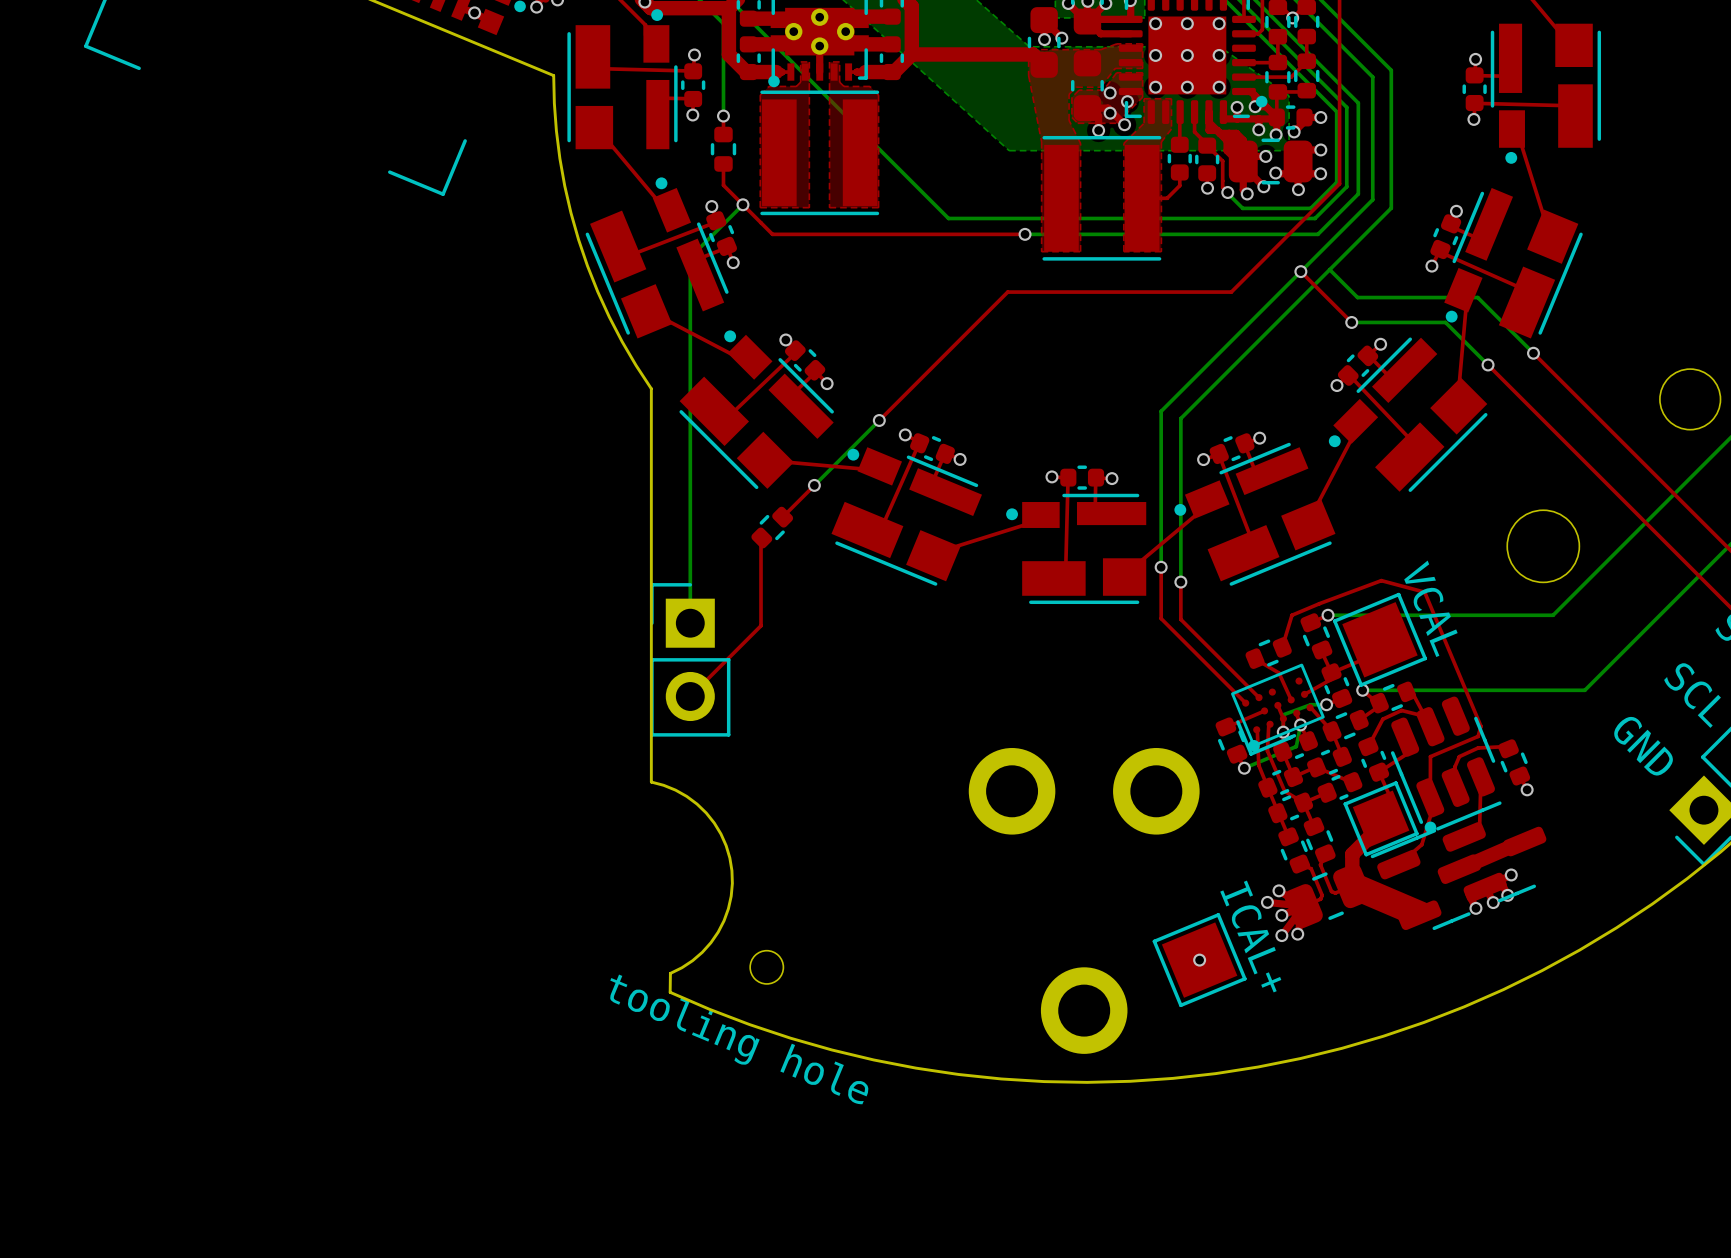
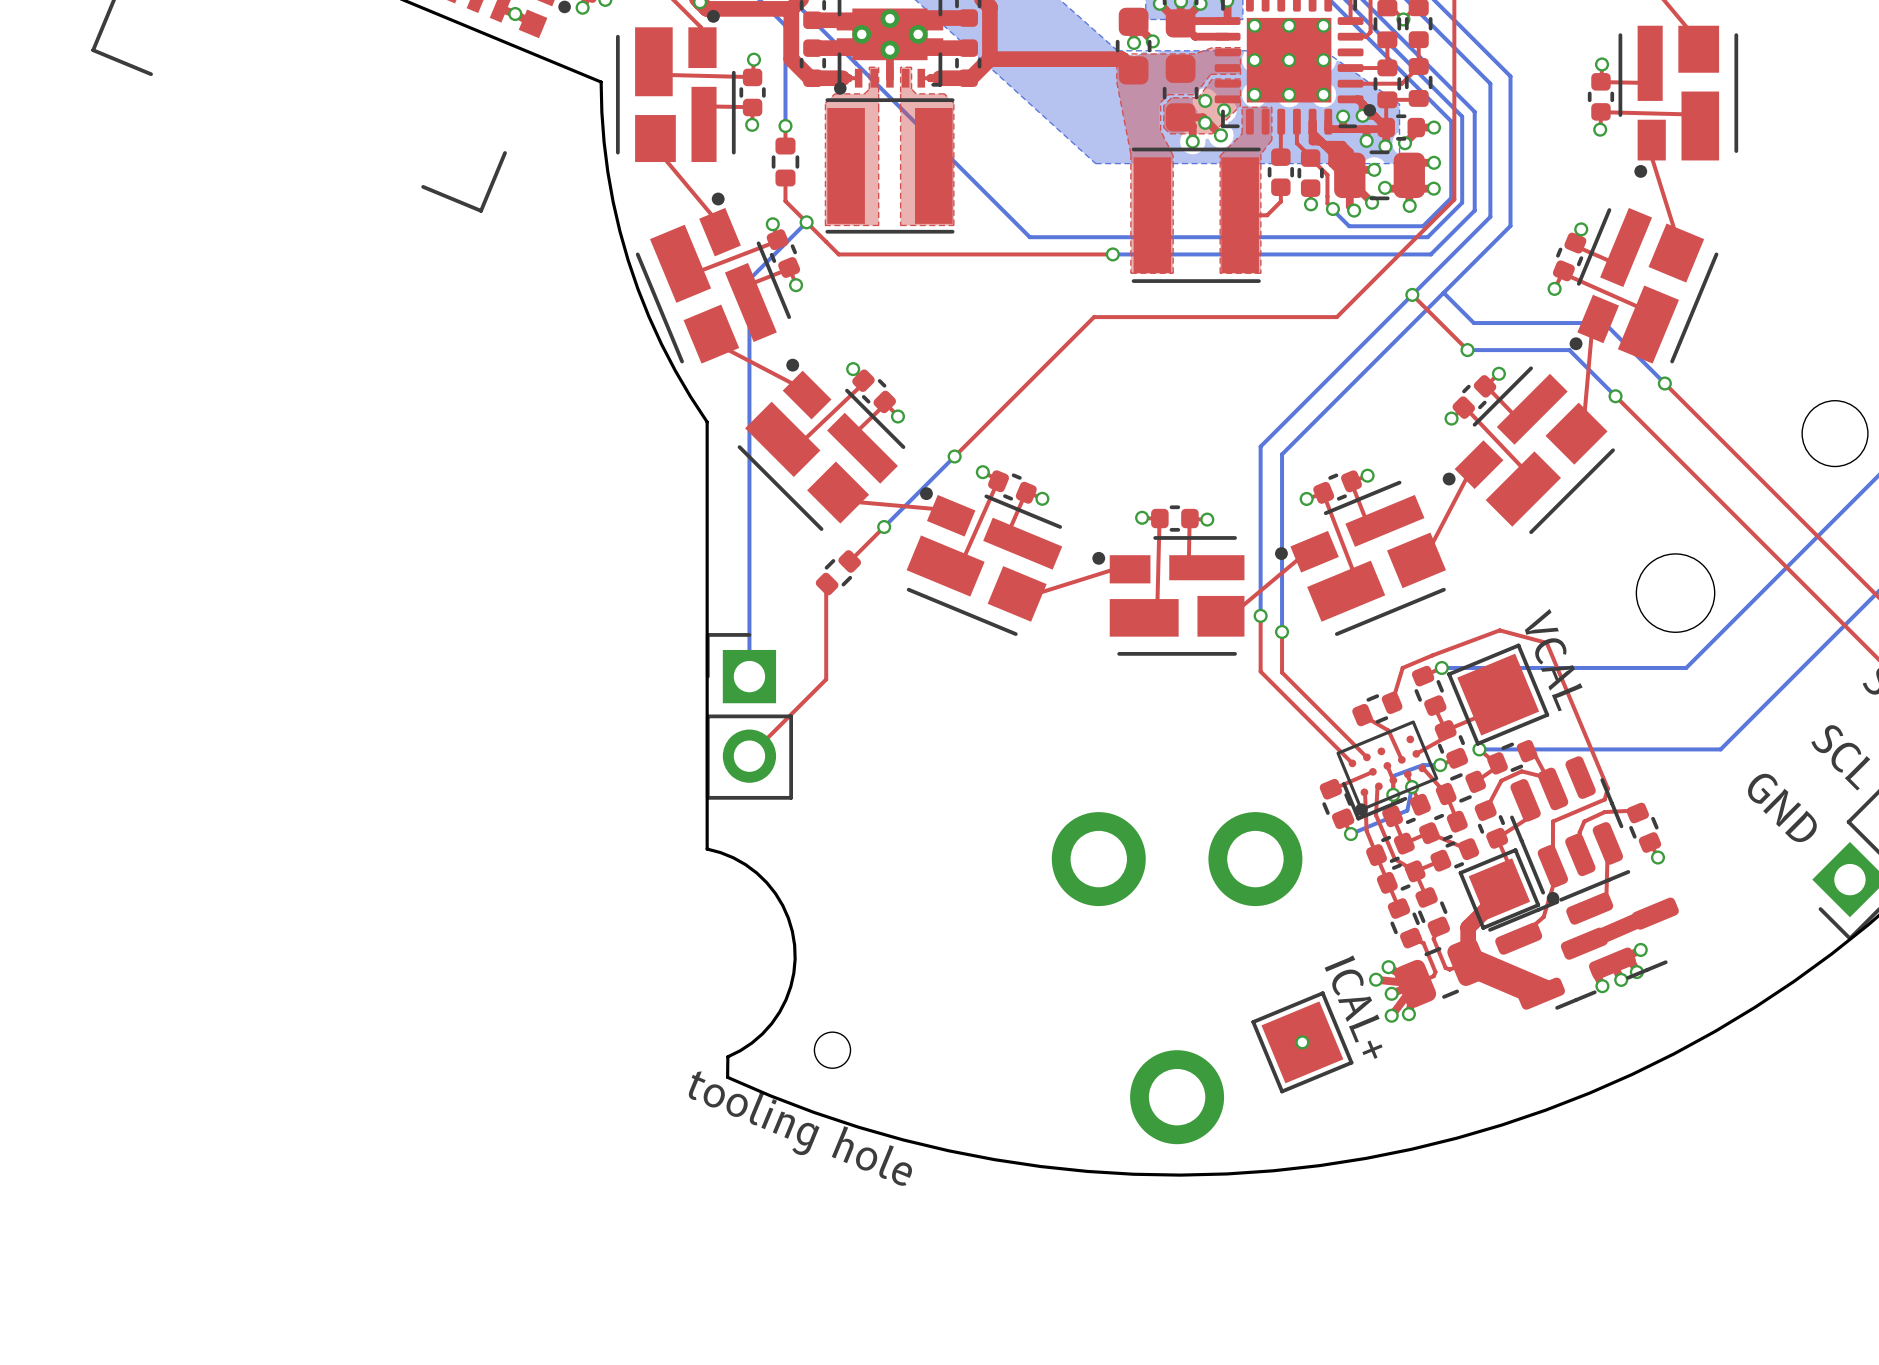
part footprint: [567, 9, 678, 150] -> [615, 9, 736, 163]
part footprint: [1490, 23, 1602, 164] -> [1618, 25, 1739, 178]
part footprint: [585, 177, 729, 339] -> [635, 192, 792, 364]
part footprint: [1444, 187, 1583, 339] -> [1569, 207, 1719, 364]
part footprint: [679, 330, 834, 490] -> [737, 358, 906, 531]
part footprint: [1328, 337, 1488, 492] -> [1442, 366, 1615, 535]
part footprint: [1174, 442, 1336, 586] -> [1275, 480, 1447, 636]
part footprint: [831, 447, 982, 586] -> [906, 487, 1063, 636]
part footprint: [1006, 493, 1147, 605] -> [1092, 536, 1245, 656]

